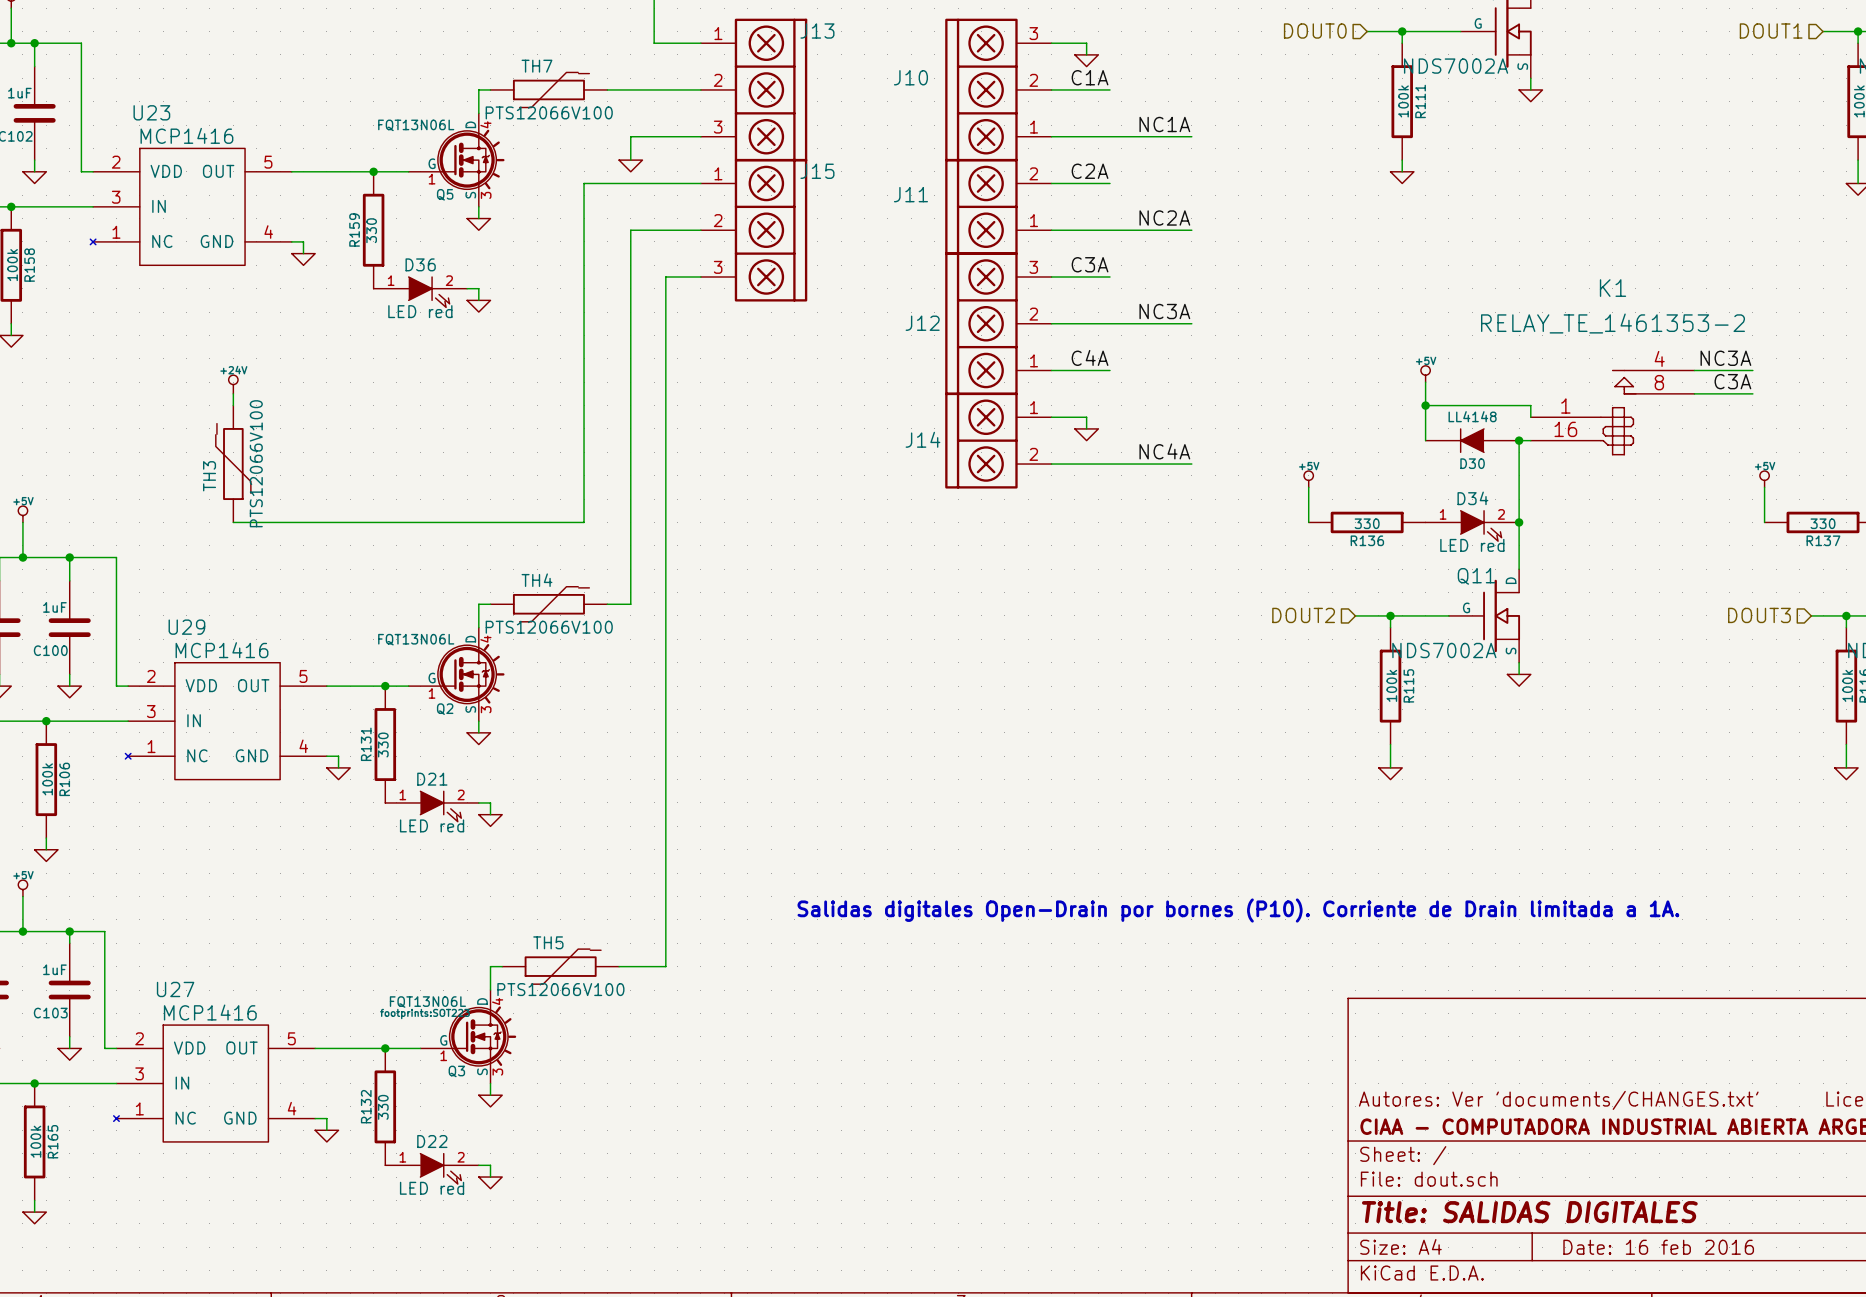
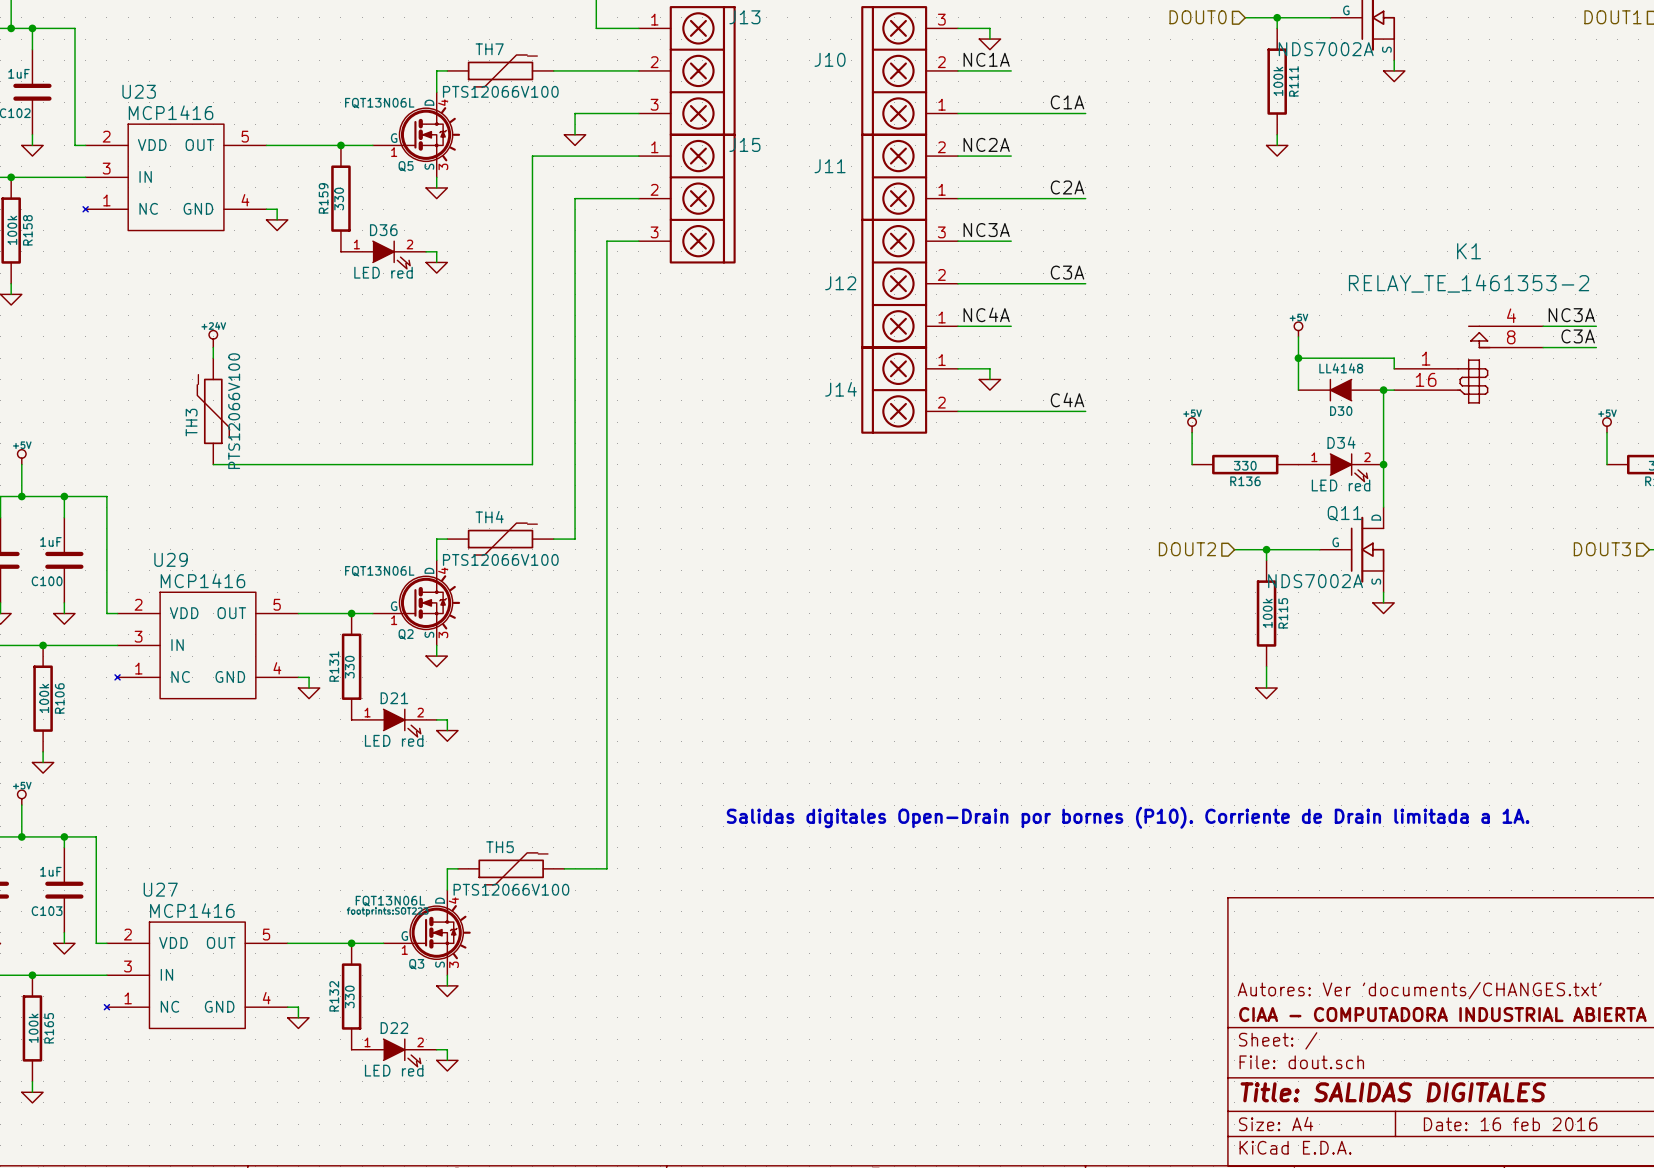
label: C1A (1090, 77) -> NC1A (986, 59)
label: NC1A (1164, 124) -> C1A (1067, 102)
label: C2A (1090, 171) -> NC2A (986, 144)
label: NC2A (1164, 218) -> C2A (1067, 187)
label: C3A (1090, 264) -> NC3A (986, 230)
label: NC3A (1164, 311) -> C3A (1067, 272)
label: C4A (1090, 357) -> NC4A (986, 314)
label: NC4A (1164, 451) -> C4A (1067, 399)

